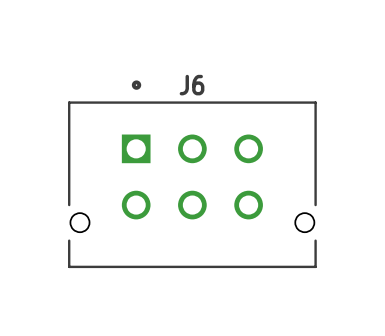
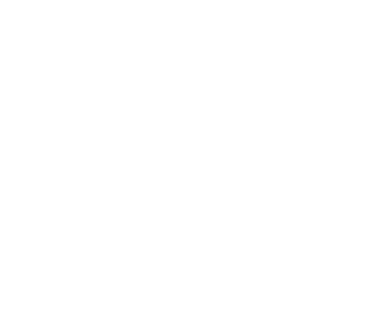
J6: (192, 174) -> none

